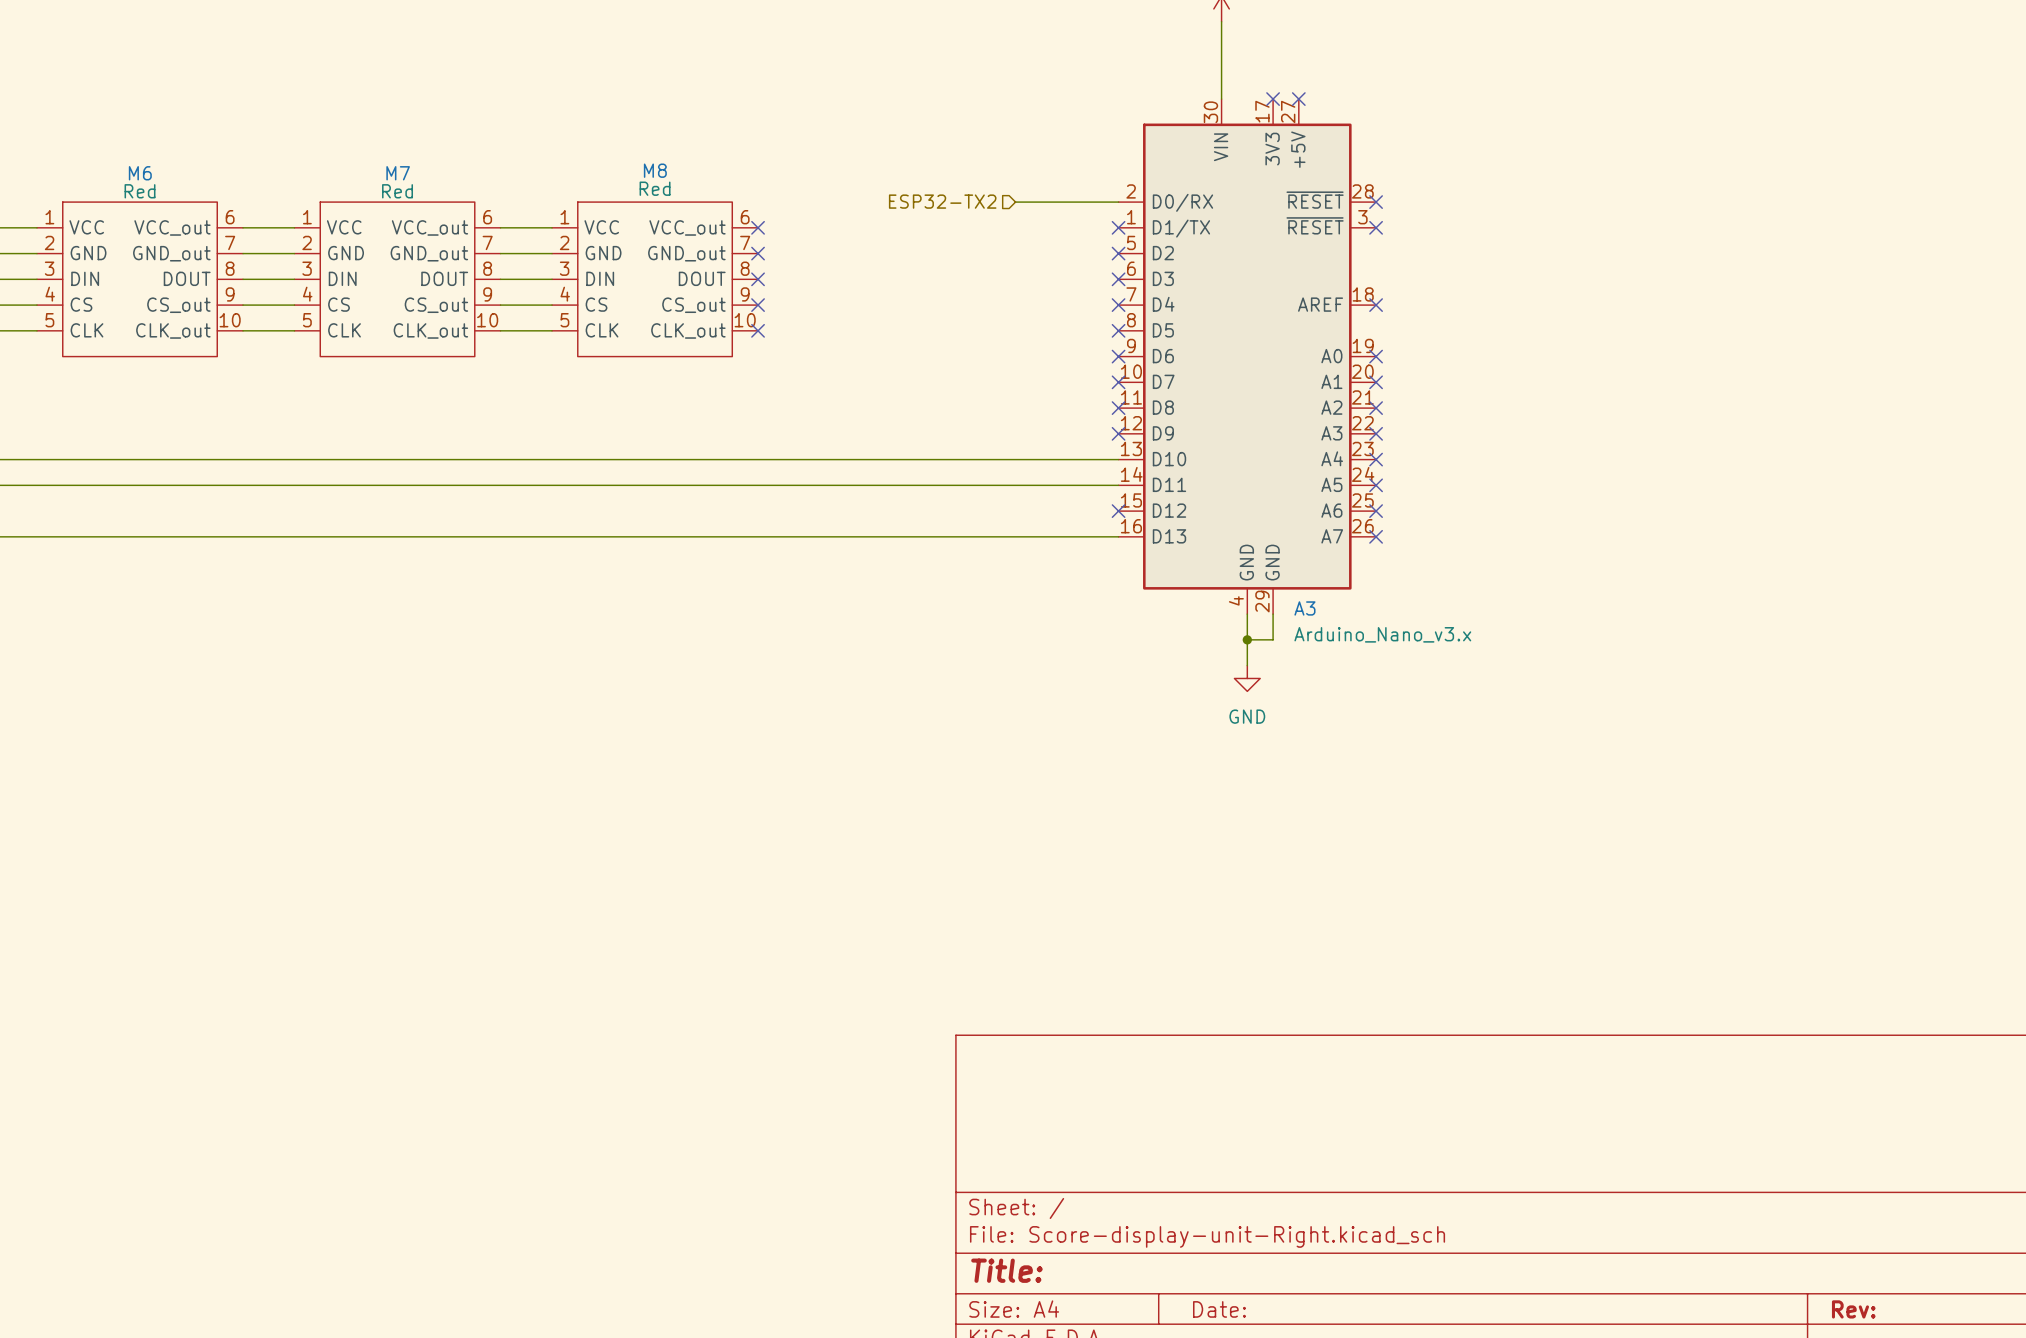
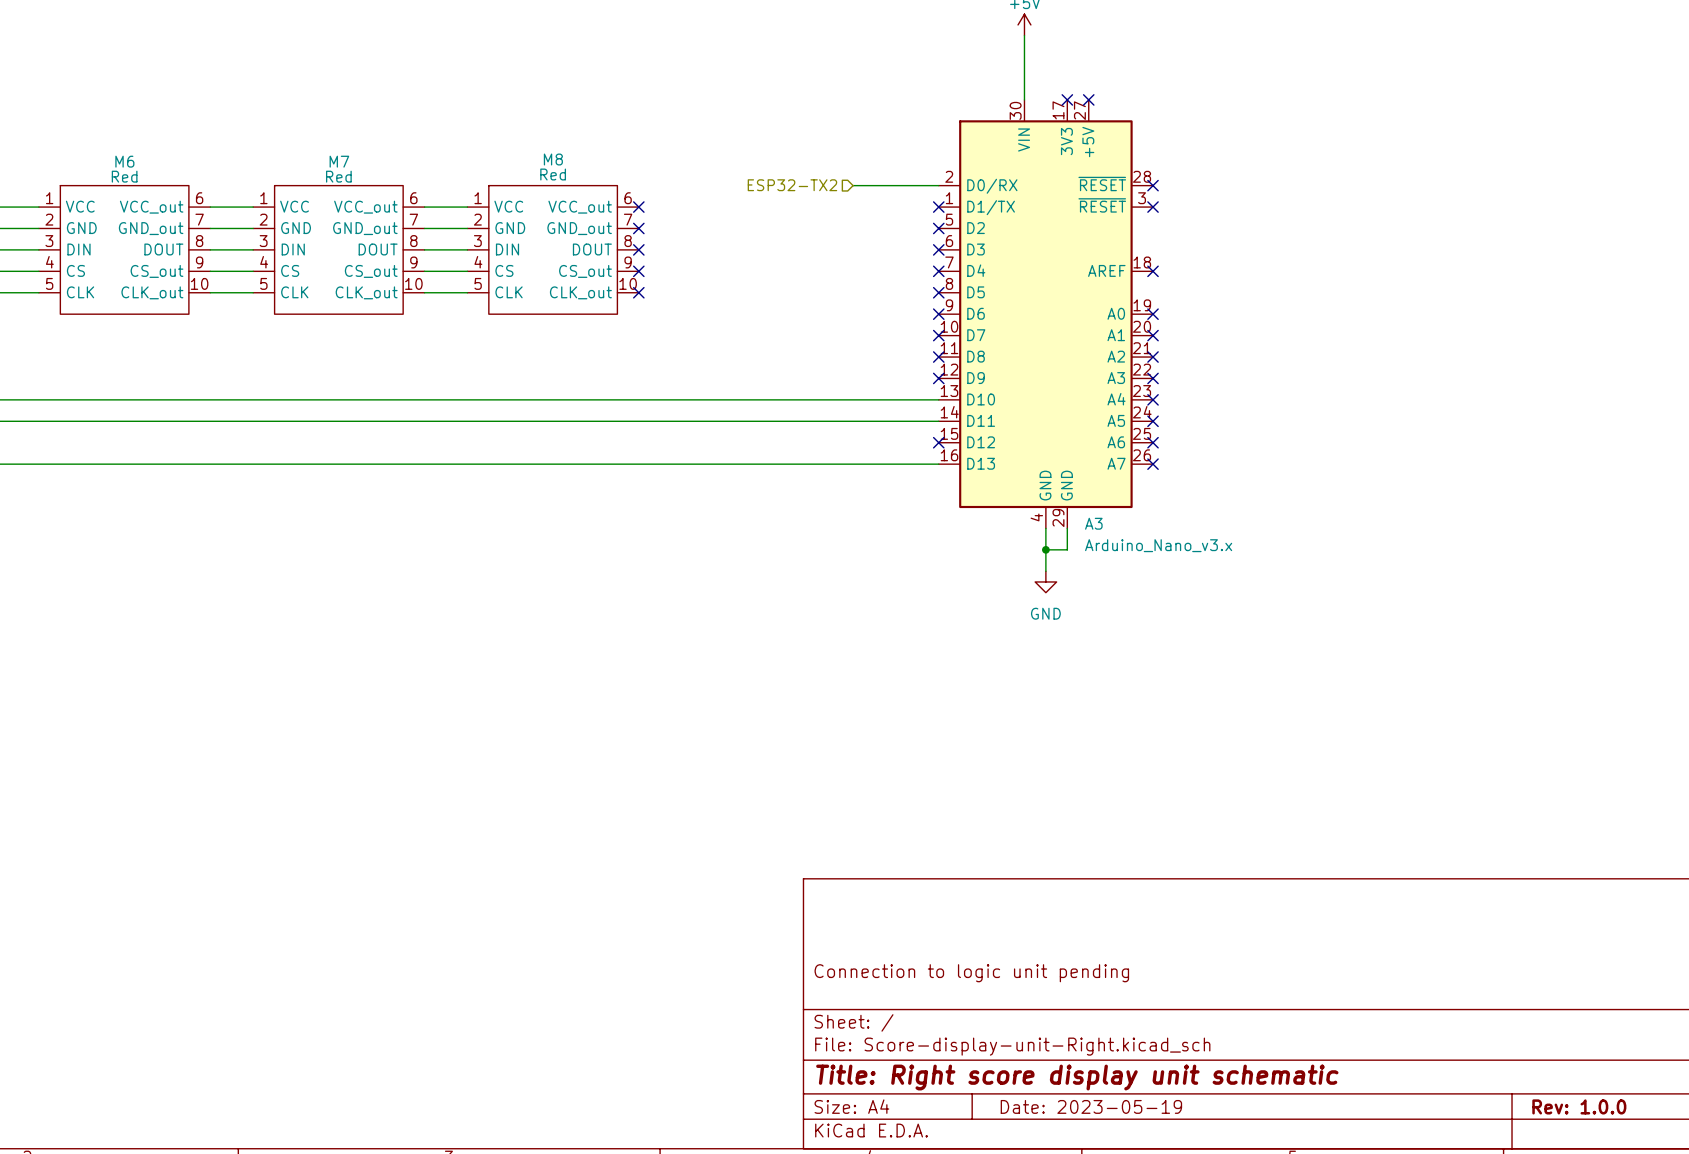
title block: none -> Connection to logic unit pending (971, 973)
title block: Title: (1006, 1270) -> Title: Right score display unit schematic (1077, 1077)
title block: Date: (1219, 1309) -> Date: 2023-05-19 (1091, 1106)
title block: Rev: (1853, 1309) -> Rev: 1.0.0 (1579, 1106)

